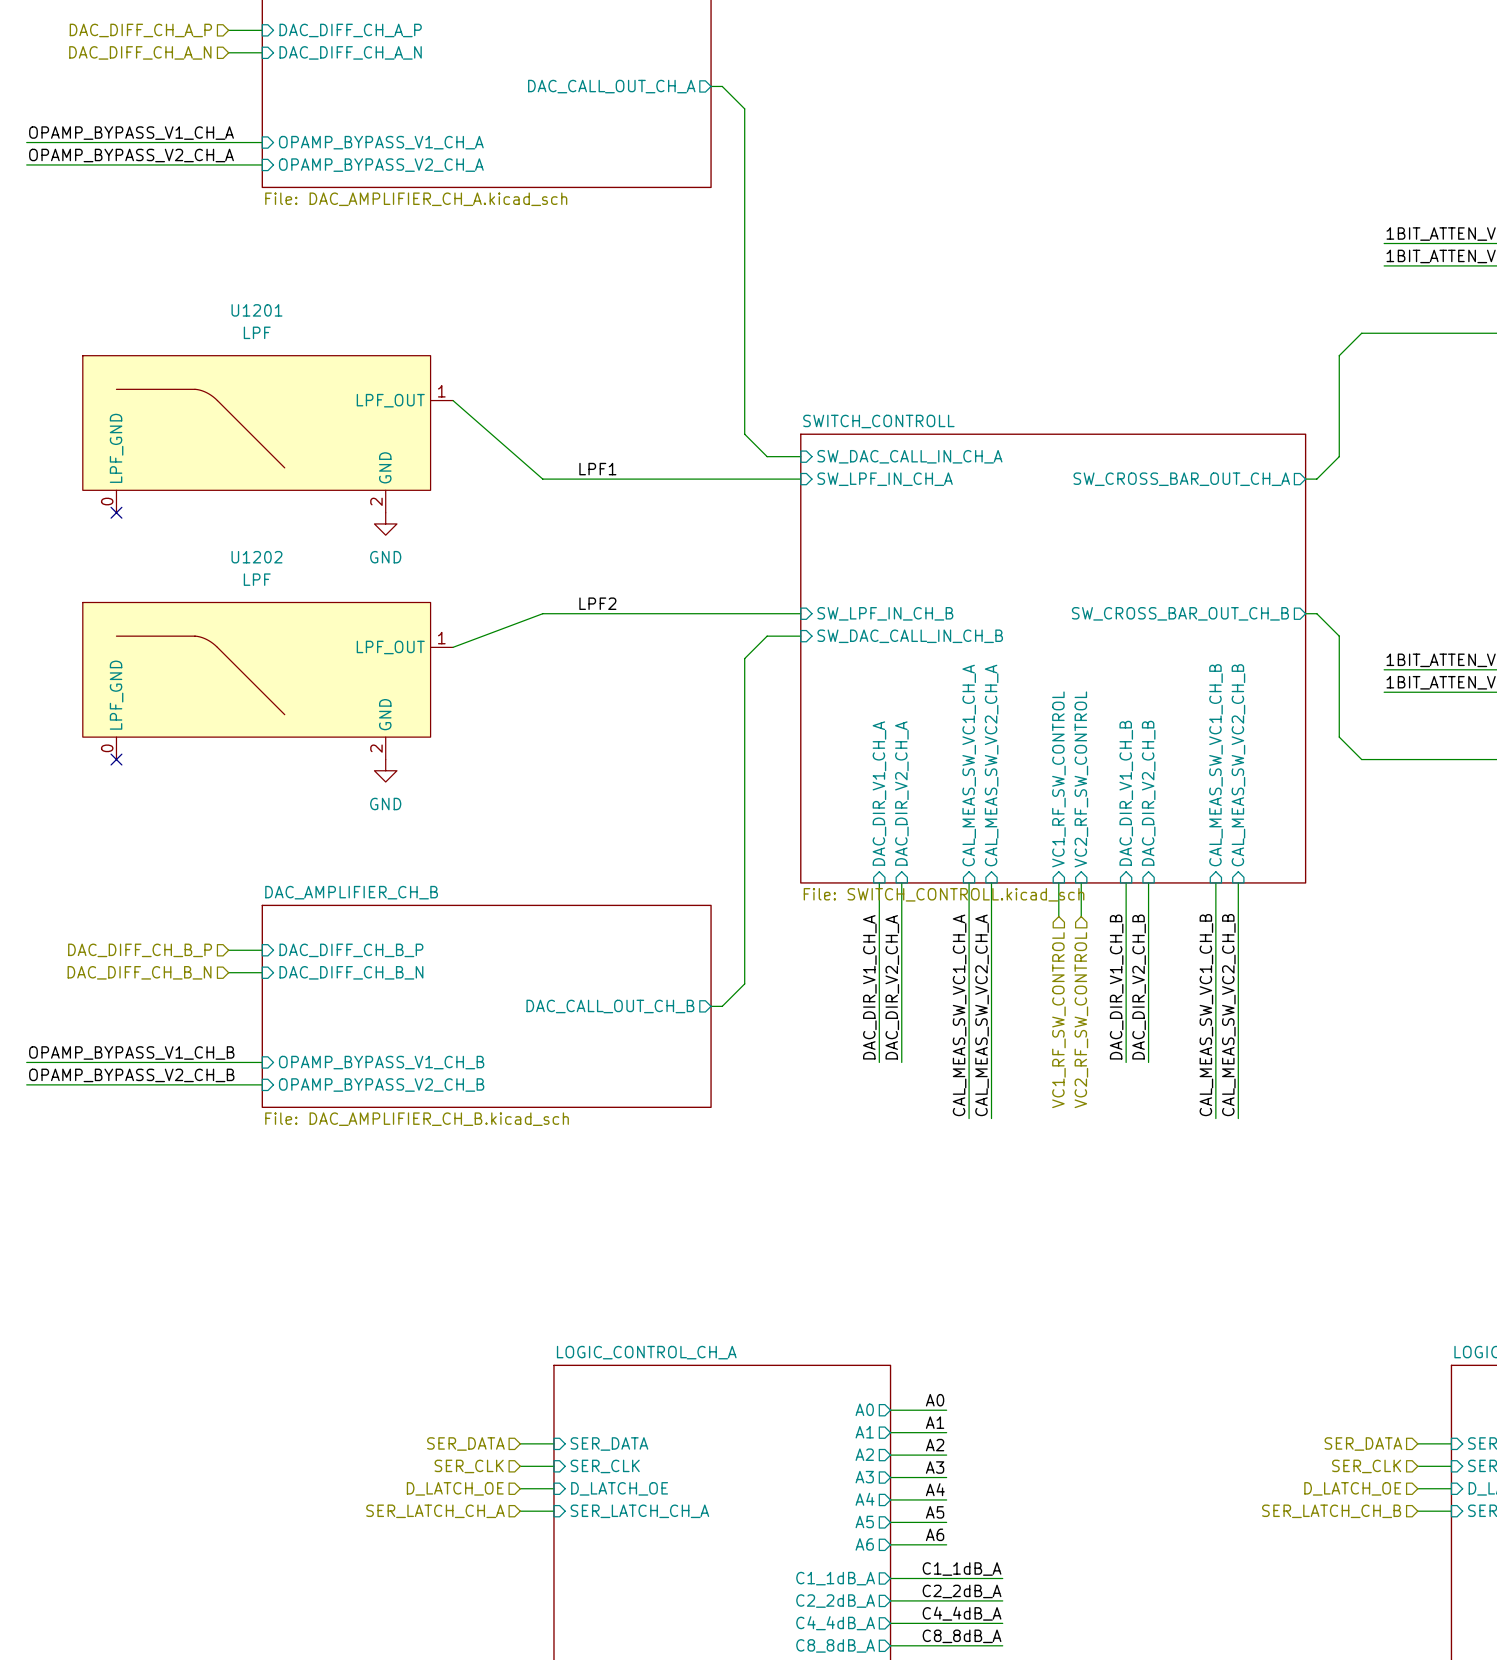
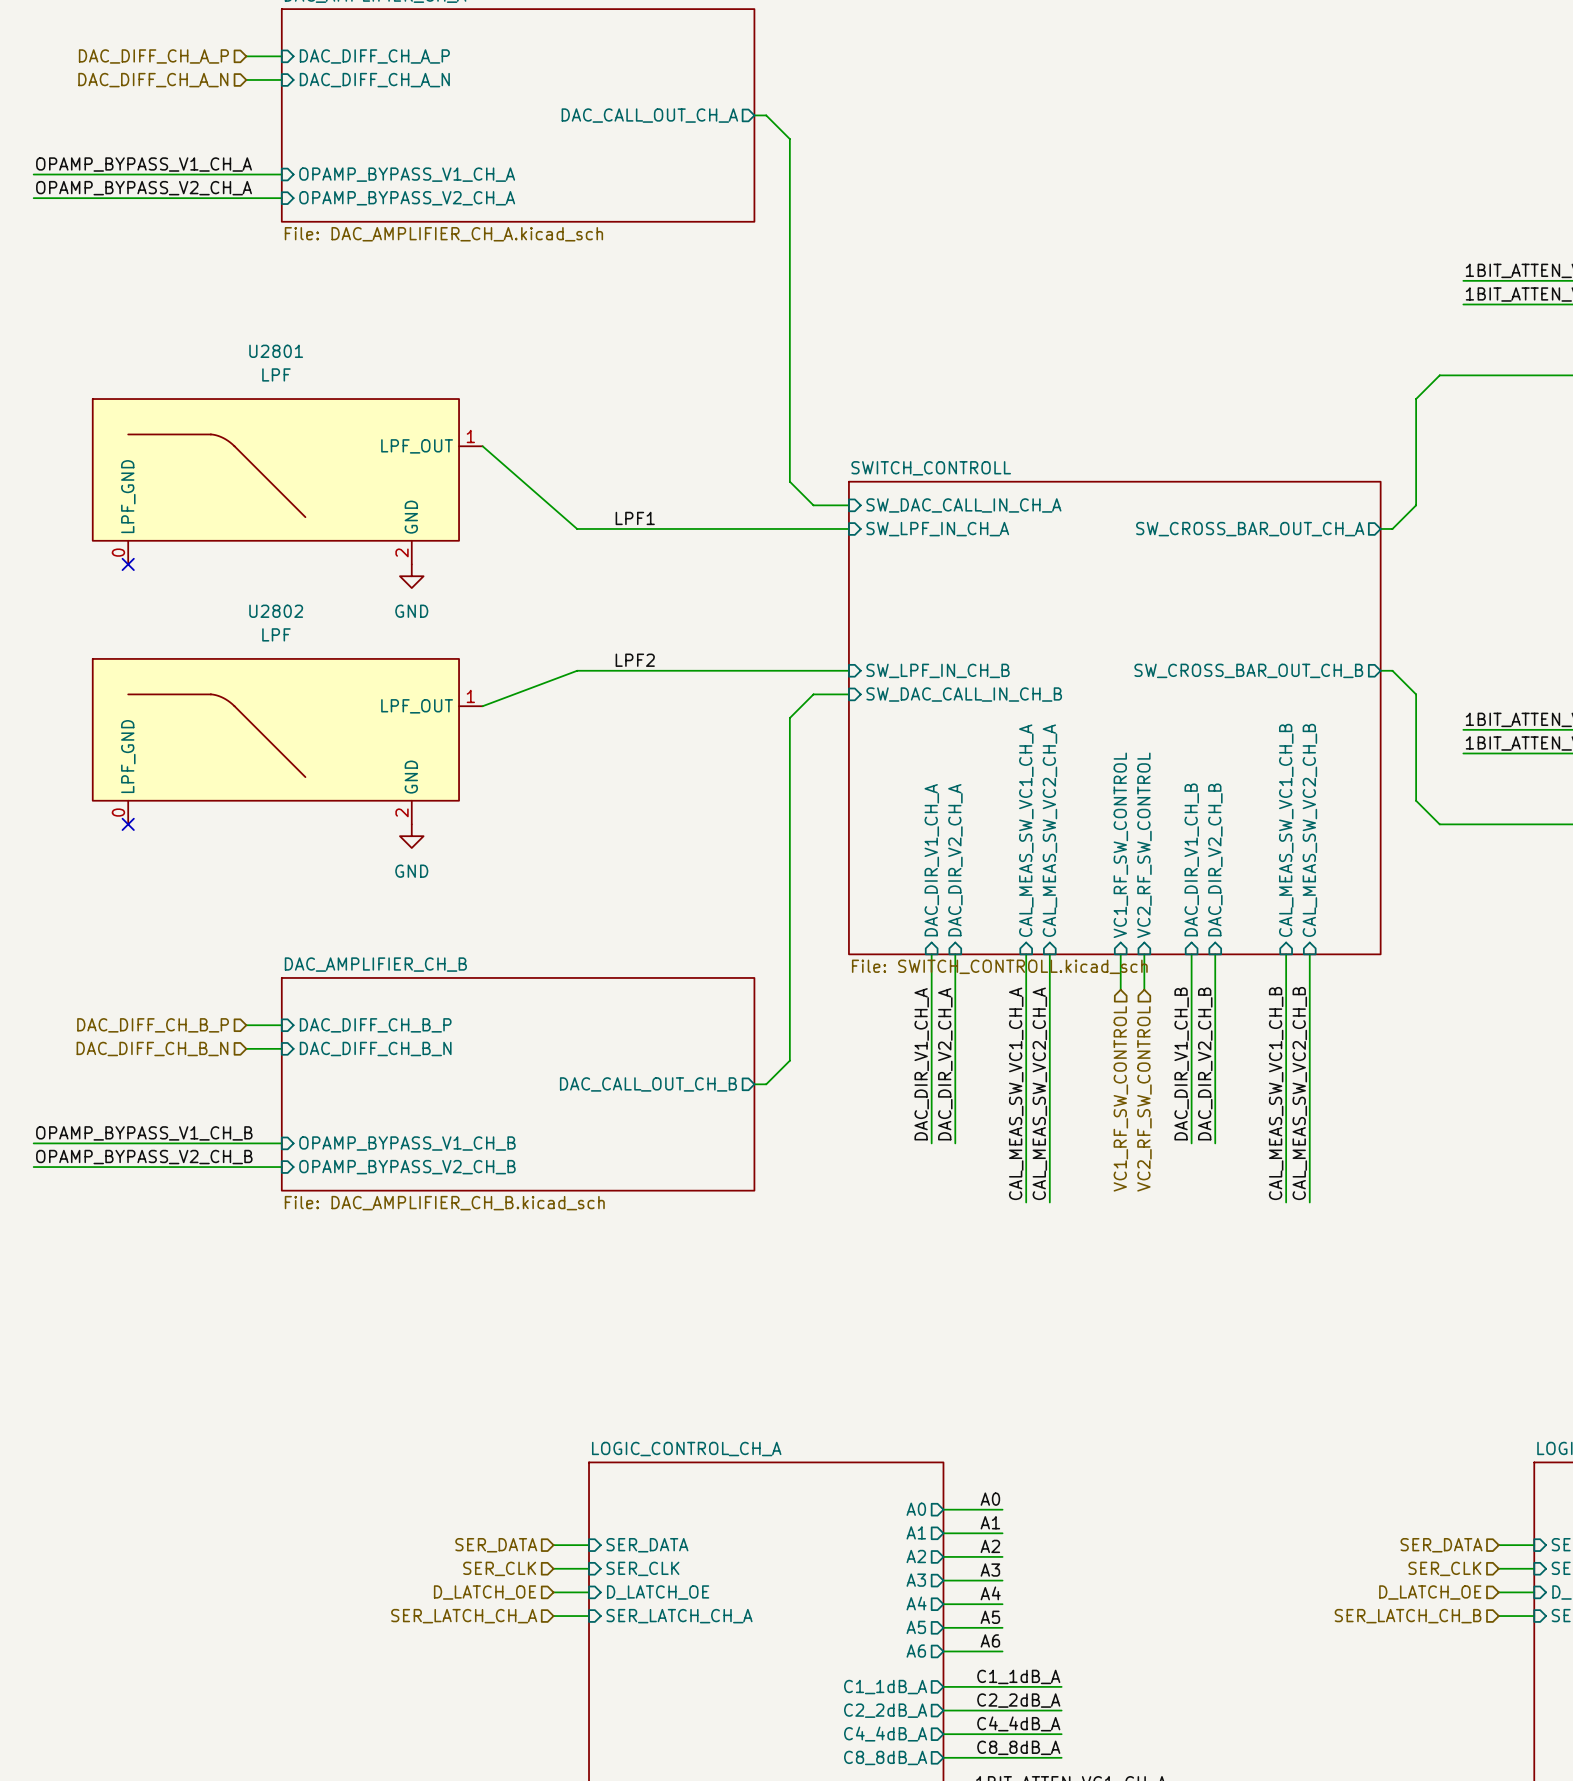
U1201 name: U1201 (256, 310) -> U2801 (276, 351)
U1202 name: U1202 (256, 557) -> U2802 (276, 611)

